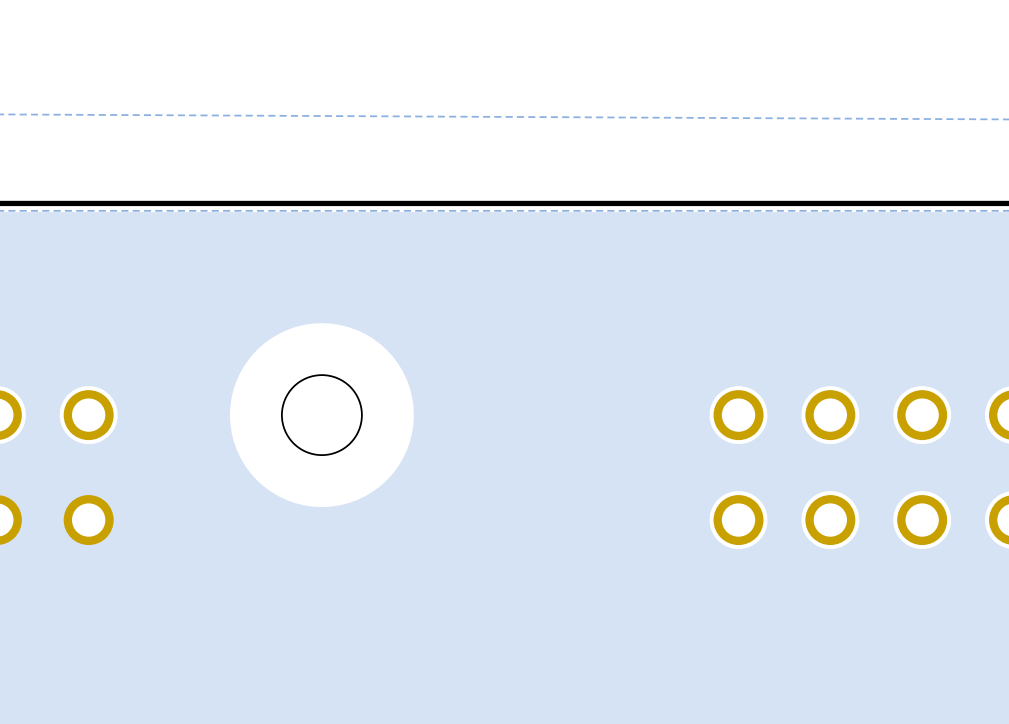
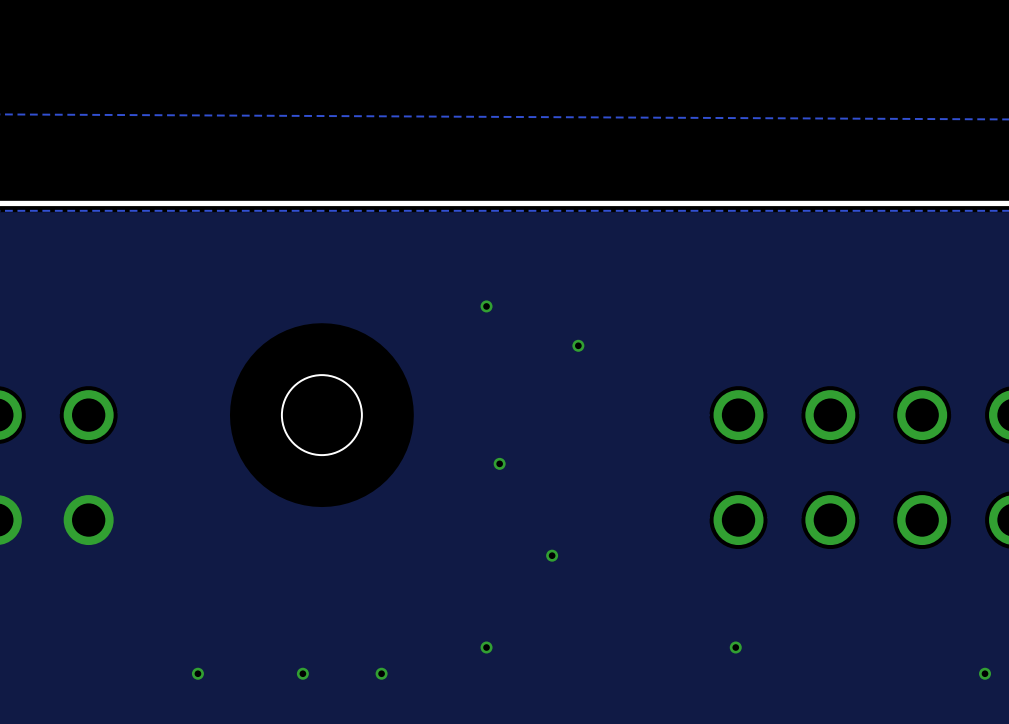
via: none -> (486, 306)
via: none -> (578, 345)
via: none -> (499, 463)
via: none -> (552, 555)
via: none -> (486, 647)
via: none -> (735, 647)
via: none -> (197, 673)
via: none -> (302, 673)
via: none -> (381, 673)
via: none -> (985, 673)

